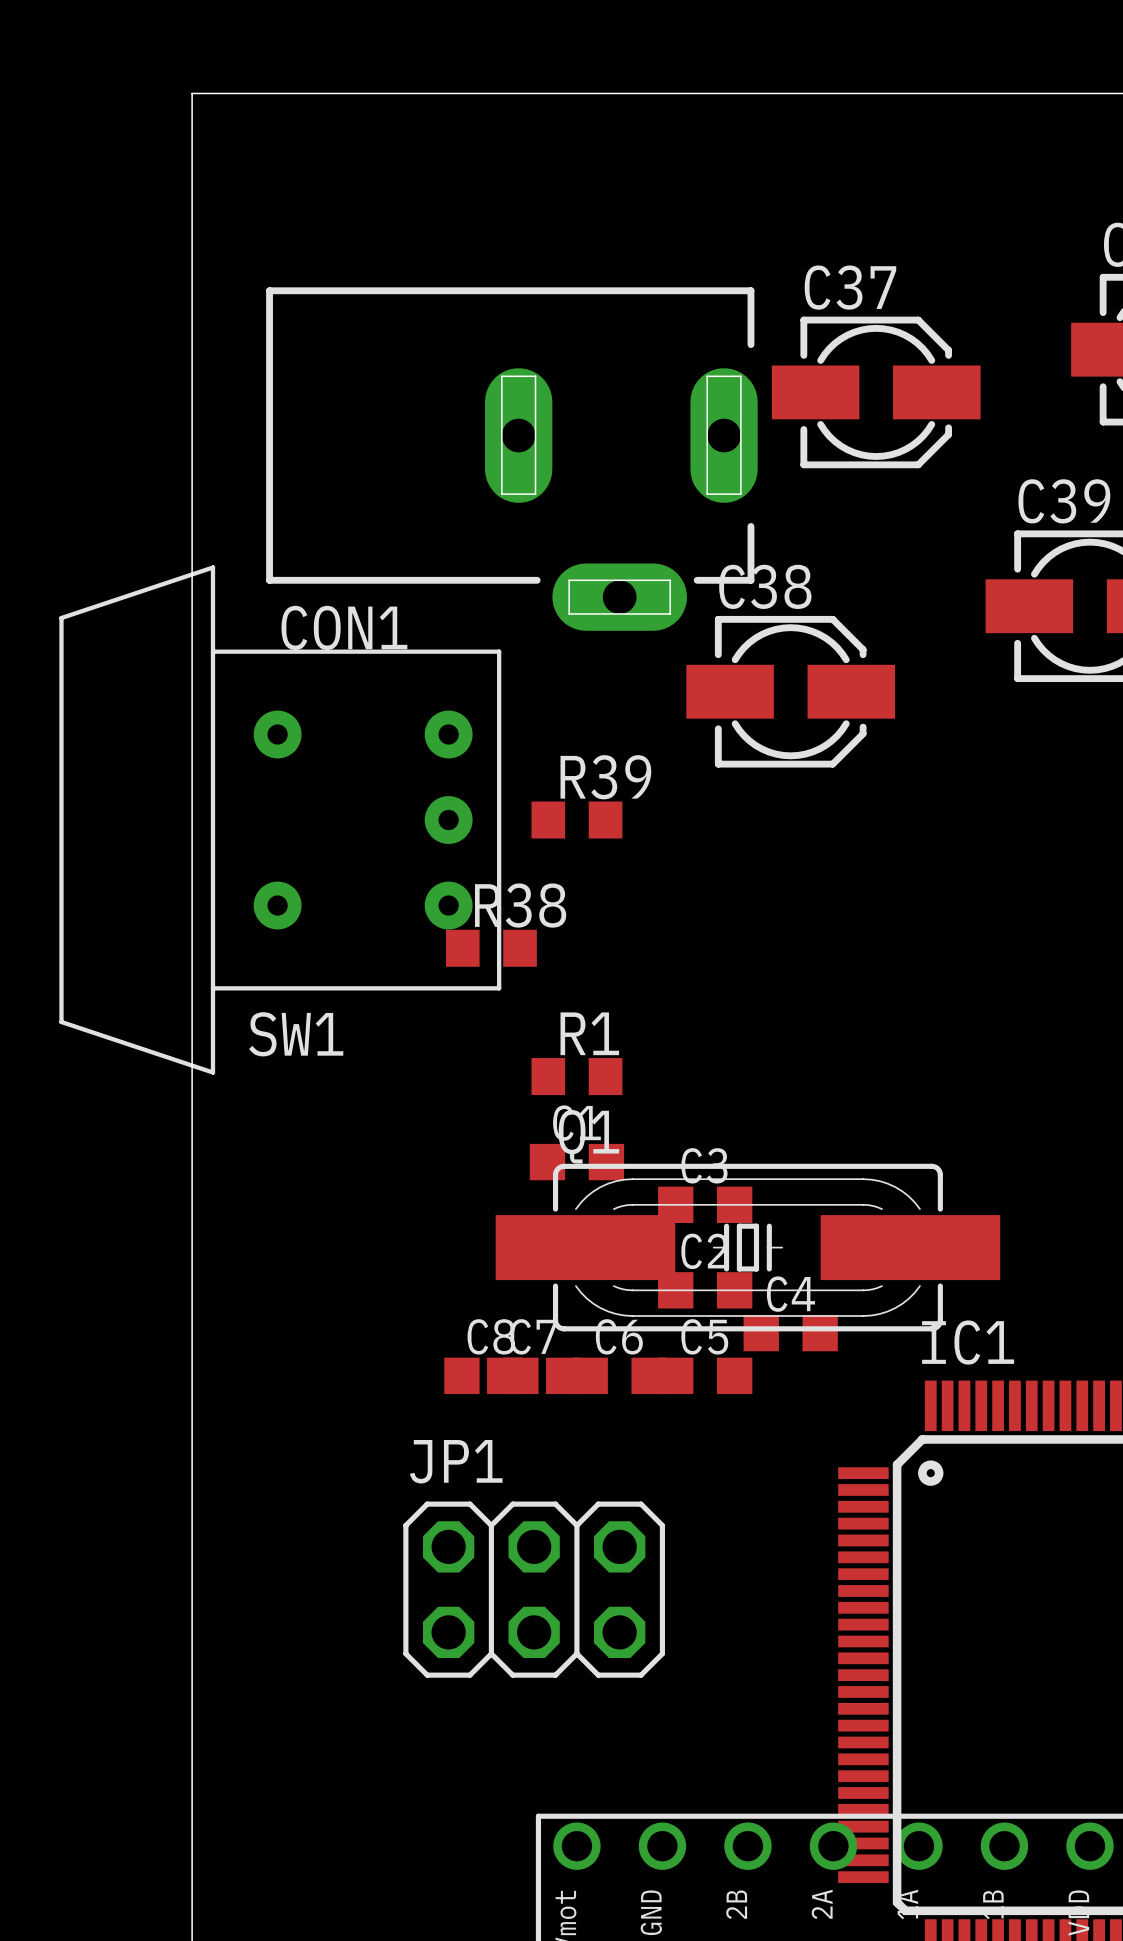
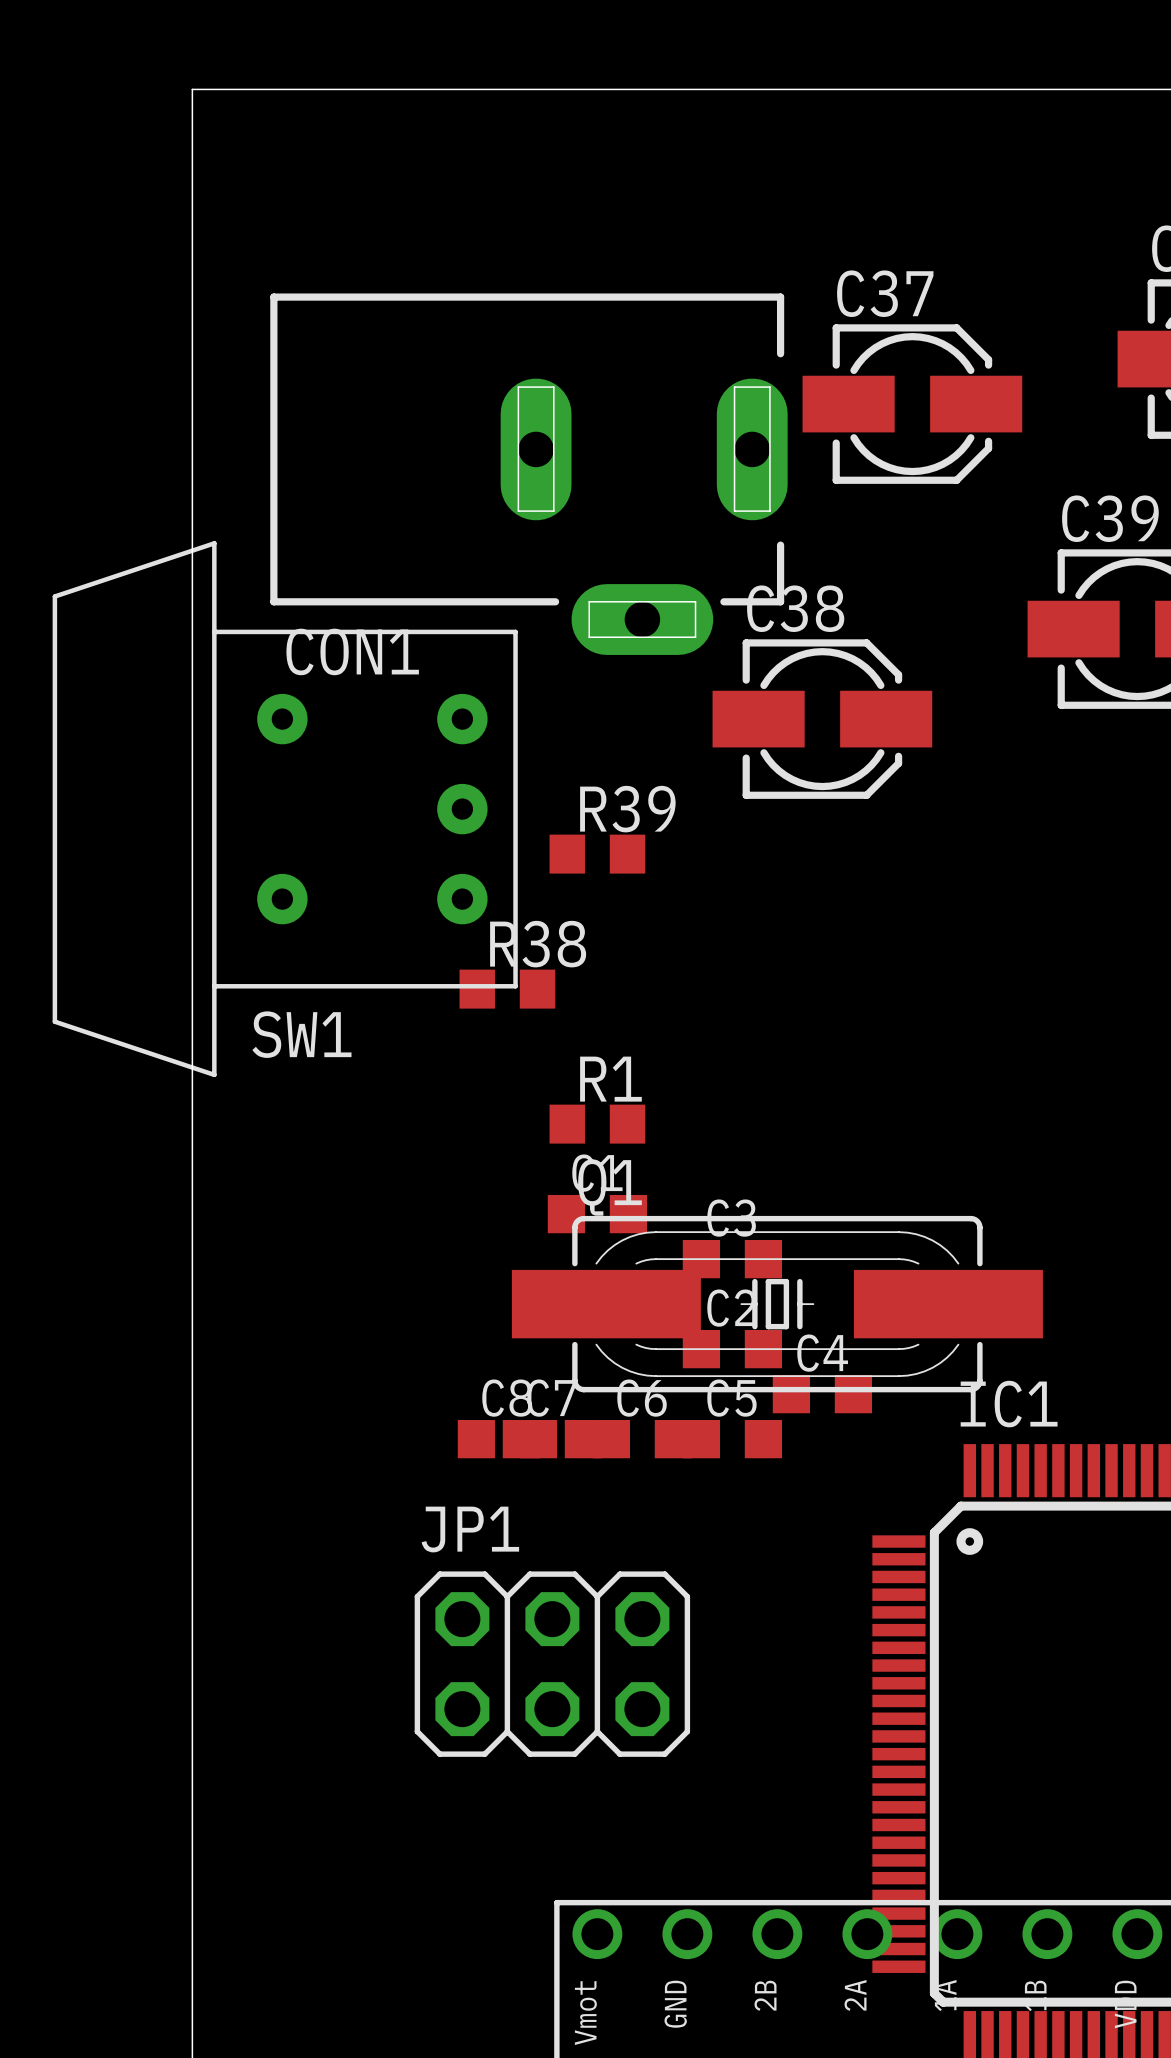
SW1 position: (280, 820) -> (285, 809)

